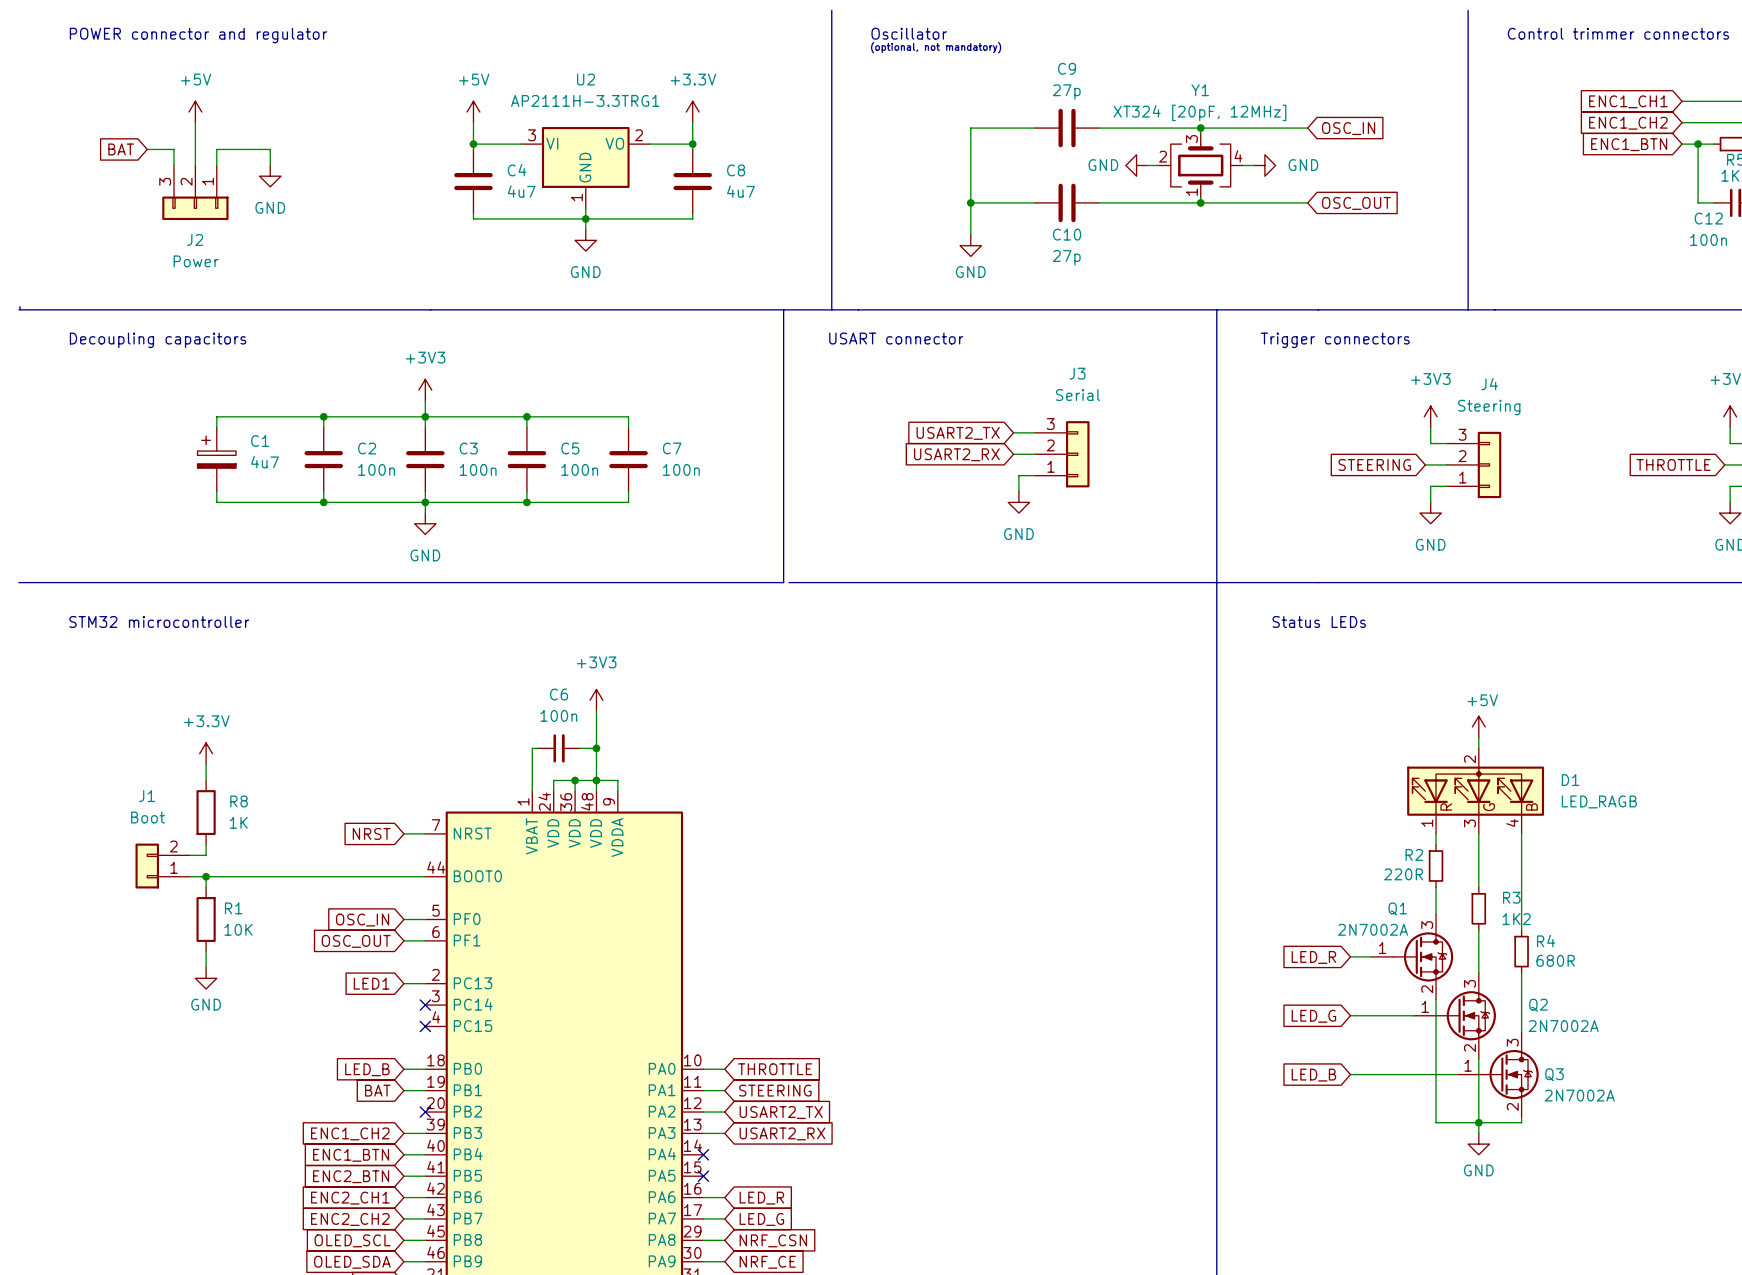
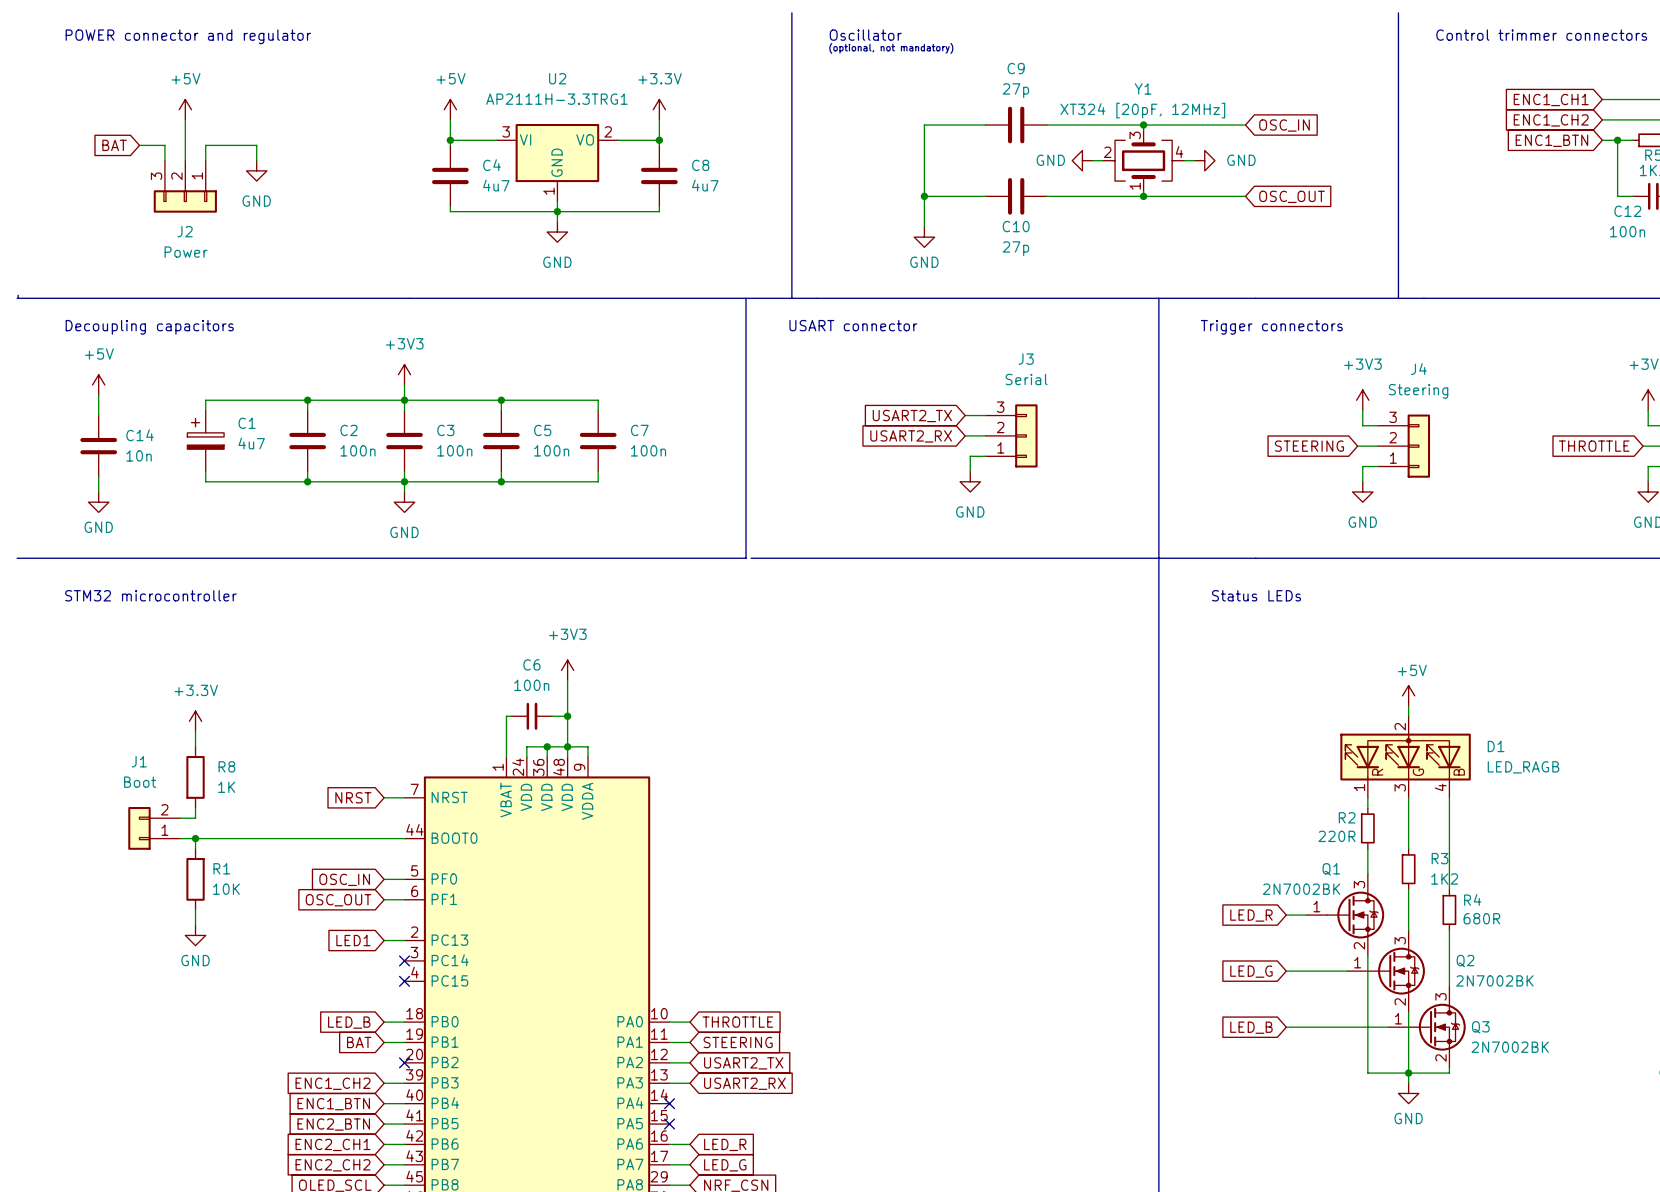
power symbol: none -> +5V (98, 384)
wire: none -> (98, 395) (98, 415)
C14: none -> 10n (98, 446)
wire: none -> (98, 476) (98, 492)
power symbol: none -> GND (98, 502)
Q1 value: 2N7002A (1373, 929) -> 2N7002BK (1301, 889)
Q2 value: 2N7002A (1563, 1026) -> 2N7002BK (1494, 980)
Q3 value: 2N7002A (1579, 1095) -> 2N7002BK (1510, 1047)

